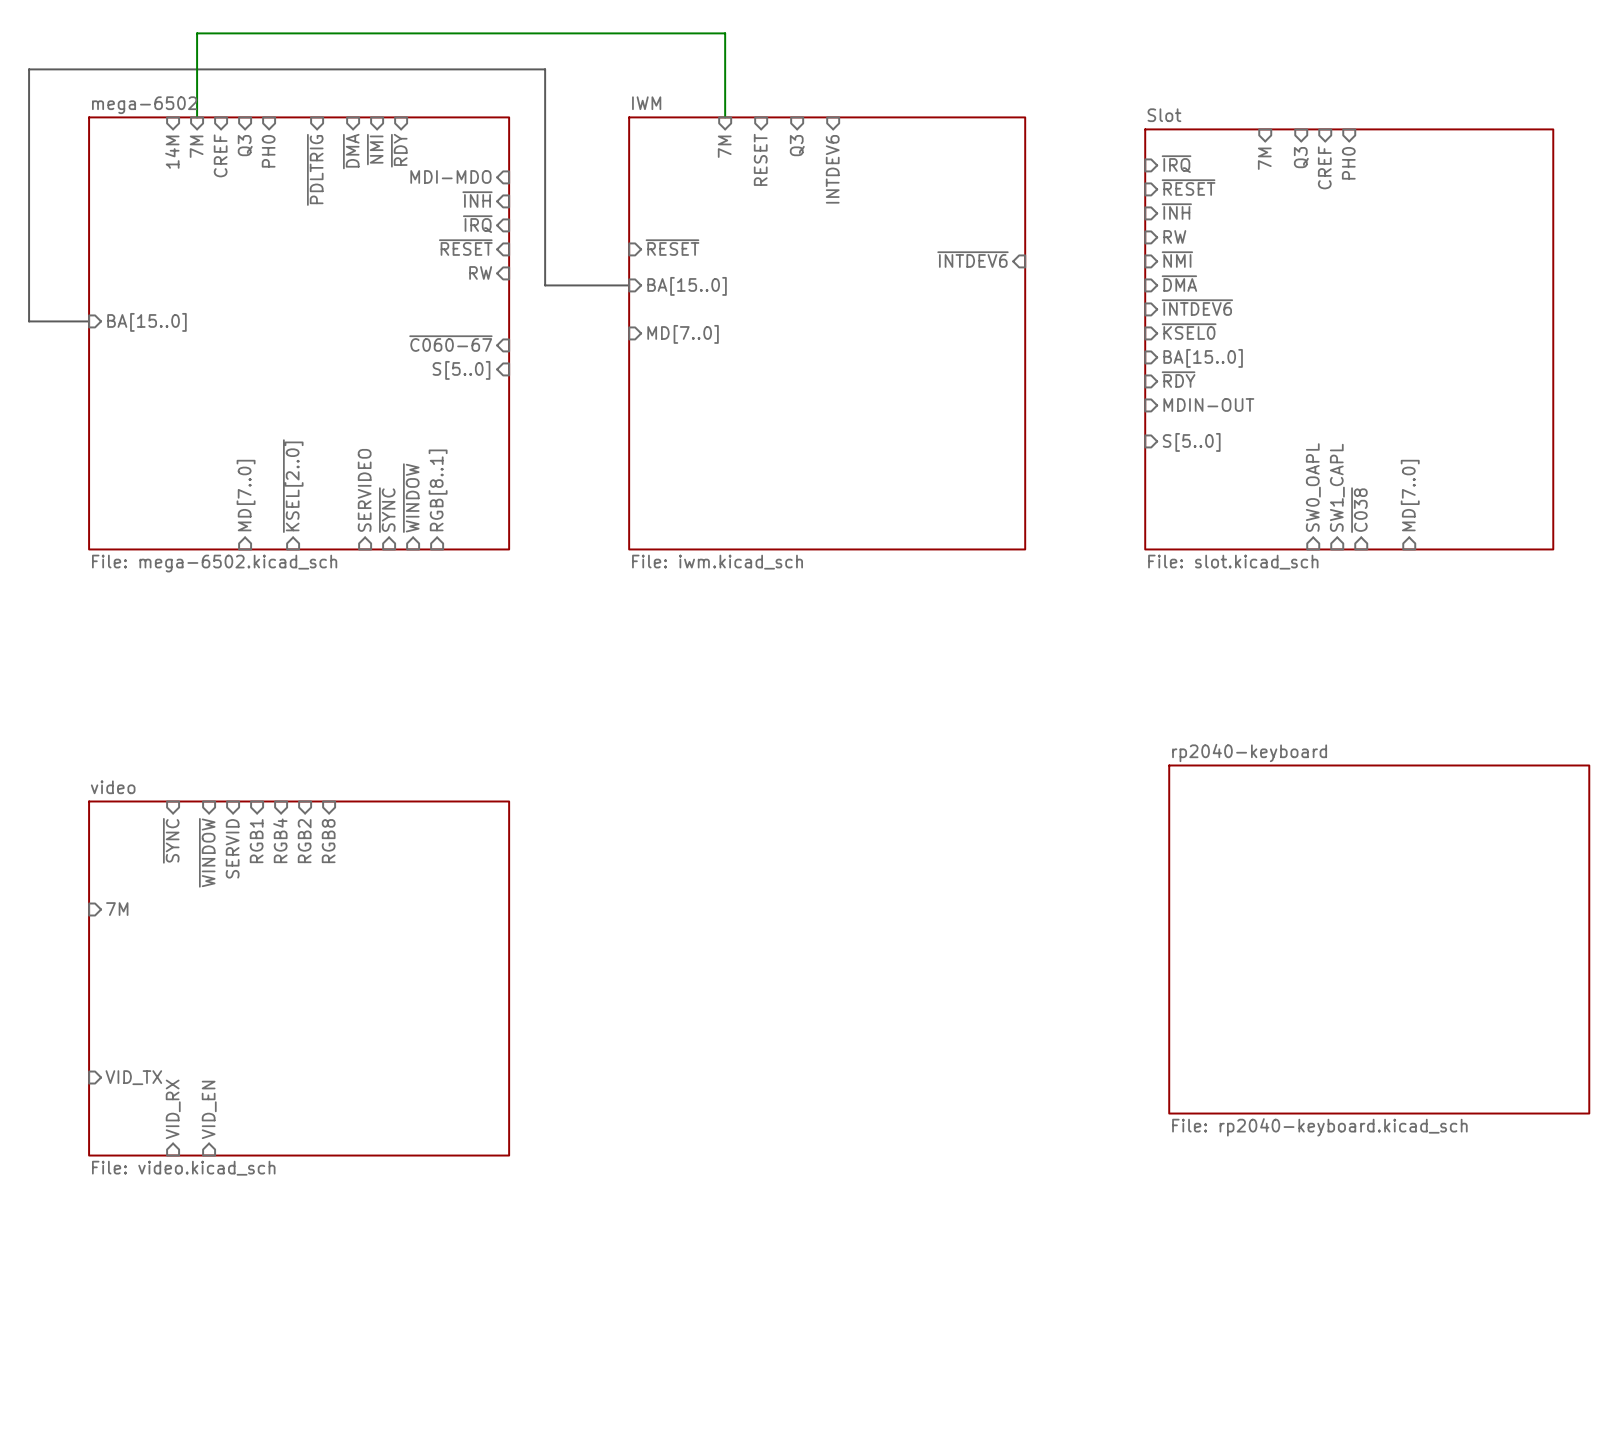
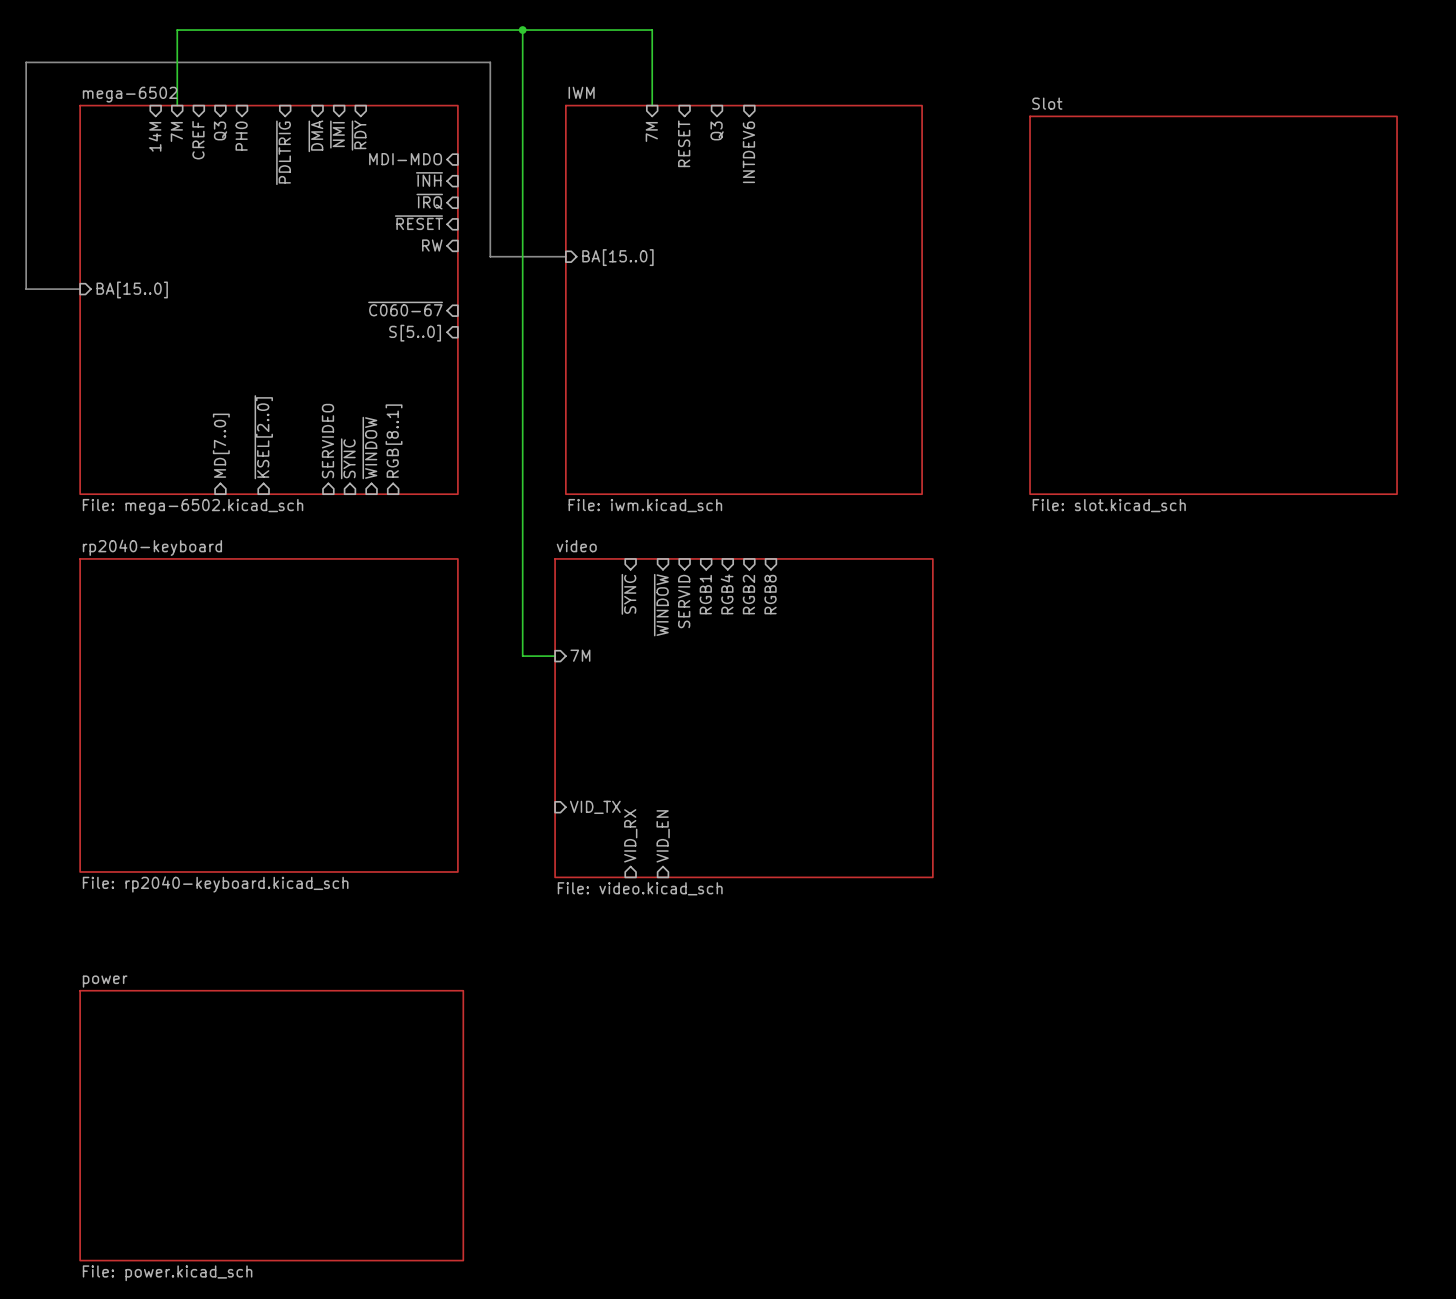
wire: none -> (522, 30) (522, 656) (555, 656)
junction: none -> (522, 30)
sheet pin: Q3 (1301, 157) -> none
sheet pin: 7M (1264, 158) -> none
sheet pin: PH0 (1348, 163) -> none
sheet pin: ~{IRQ} (1176, 164) -> none
sheet pin: CREF (1324, 167) -> none
sheet pin: ~{RESET} (1188, 187) -> none
sheet pin: ~{INH} (1176, 211) -> none
sheet pin: RW (1174, 236) -> none
sheet pin: ~{RESET} (672, 247) -> none
sheet pin: ~{INTDEV6} (973, 259) -> none
sheet pin: ~{NMI} (1177, 259) -> none
sheet pin: ~{DMA} (1179, 283) -> none
sheet pin: ~{INTDEV6} (1197, 307) -> none
sheet pin: ~{KSEL0} (1189, 331) -> none
sheet pin: MD[7..0] (683, 334) -> none
sheet pin: BA[15..0] (1203, 358) -> none
sheet pin: ~{RDY} (1178, 379) -> none
sheet pin: MDIN-OUT (1208, 404) -> none
sheet pin: S[5..0] (1191, 442) -> none
sheet pin: SW0_OAPL (1313, 487) -> none
sheet pin: SW1_CAPL (1337, 487) -> none
sheet pin: MD[7..0] (1410, 495) -> none
sheet pin: ~{C038} (1359, 510) -> none
sheet pin: none -> ~{SYNC} (628, 594)
sheet pin: none -> RGB4 (727, 594)
sheet pin: none -> RGB1 (705, 594)
sheet pin: none -> RGB2 (748, 594)
sheet pin: none -> RGB8 (770, 594)
sheet pin: none -> SERVID (684, 601)
sheet pin: none -> ~{WINDOW} (661, 605)
sheet pin: none -> 7M (580, 655)
sheet video: none -> File: video.kicad_sch (743, 718)
sheet pin: ~{SYNC} (171, 840) -> none
sheet pin: RGB4 (280, 840) -> none
sheet pin: RGB1 (256, 841) -> none
sheet pin: RGB2 (304, 841) -> none
sheet pin: RGB8 (328, 841) -> none
sheet pin: SERVID (232, 848) -> none
sheet pin: ~{WINDOW} (207, 852) -> none
sheet pin: none -> VID_TX (595, 807)
sheet pin: 7M (117, 909) -> none
sheet pin: none -> VID_RX (630, 835)
sheet pin: none -> VID_EN (663, 836)
sheet rp2040-keyboard position: (1379, 939) -> (269, 715)
sheet video: File: video.kicad_sch (299, 978) -> none
sheet pin: VID_TX (133, 1077) -> none
sheet pin: VID_RX (173, 1109) -> none
sheet pin: VID_EN (209, 1109) -> none
sheet power: none -> File: power.kicad_sch (271, 1125)

